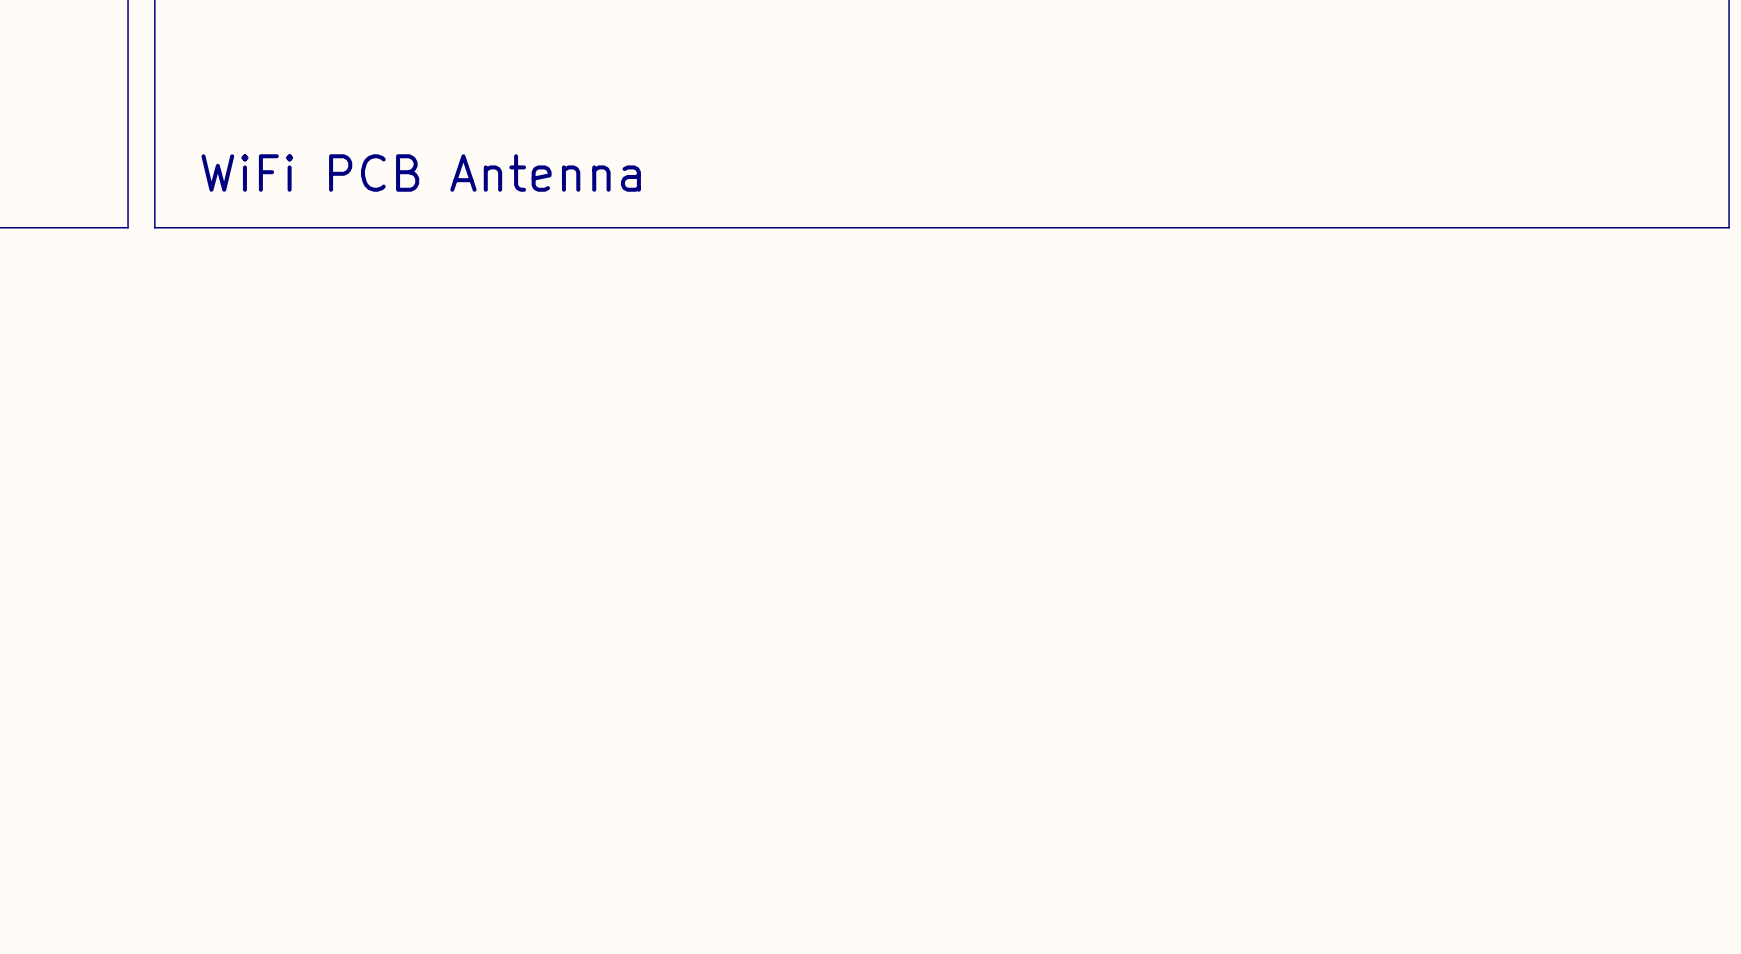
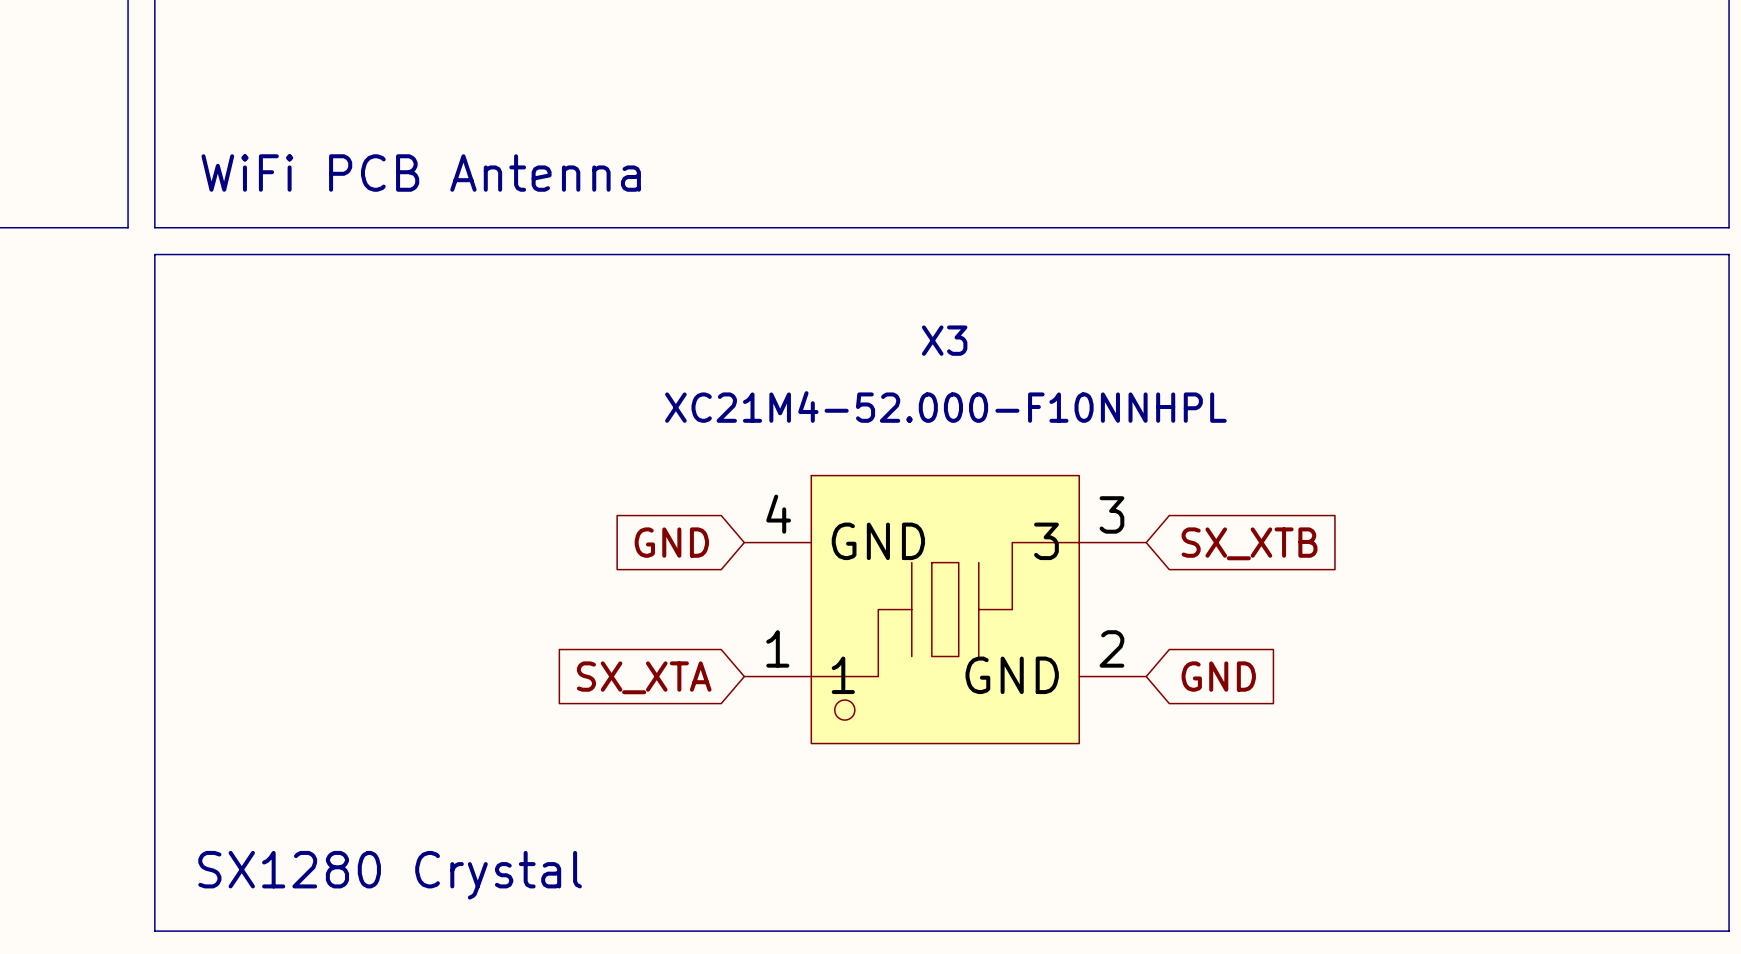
line: none -> (154, 254) (1729, 254) (1729, 931) (154, 931) (154, 254)
global label: none -> GND (671, 542)
global label: none -> SX_XTB (1249, 543)
X3: none -> XC21M4-52.000-F10NNHPL (945, 609)
global label: none -> GND (1218, 676)
global label: none -> SX_XTA (644, 677)
text: none -> SX1280 Crystal (390, 875)

